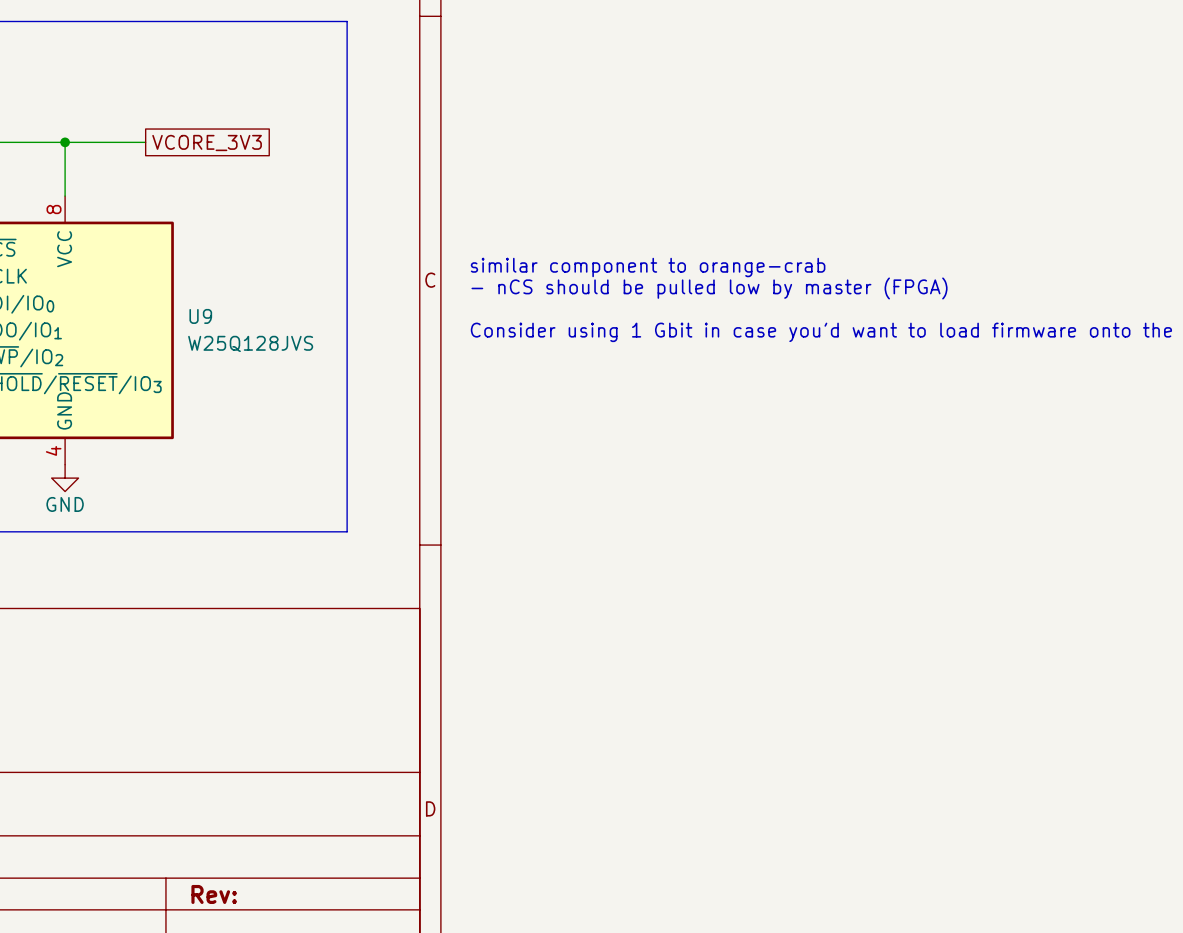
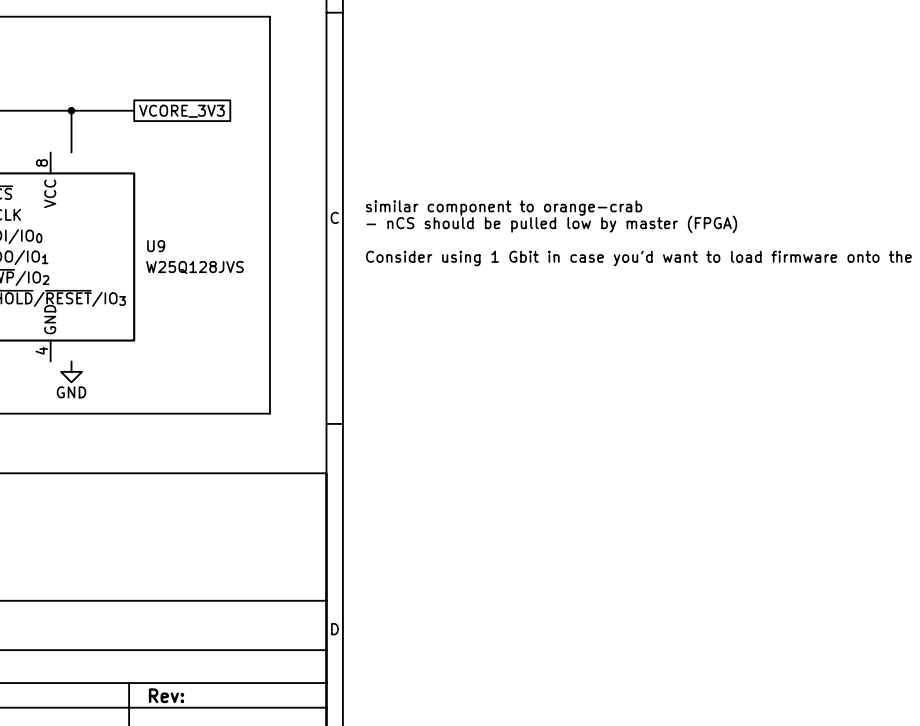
wire: (65, 142) (65, 196) -> (71, 110) (71, 152)
junction position: (65, 142) -> (71, 110)
wire: none -> (113, 110) (134, 110)
global label position: VCORE_3V3 (207, 143) -> VCORE_3V3 (181, 111)
power symbol position: GND (65, 478) -> GND (71, 371)

